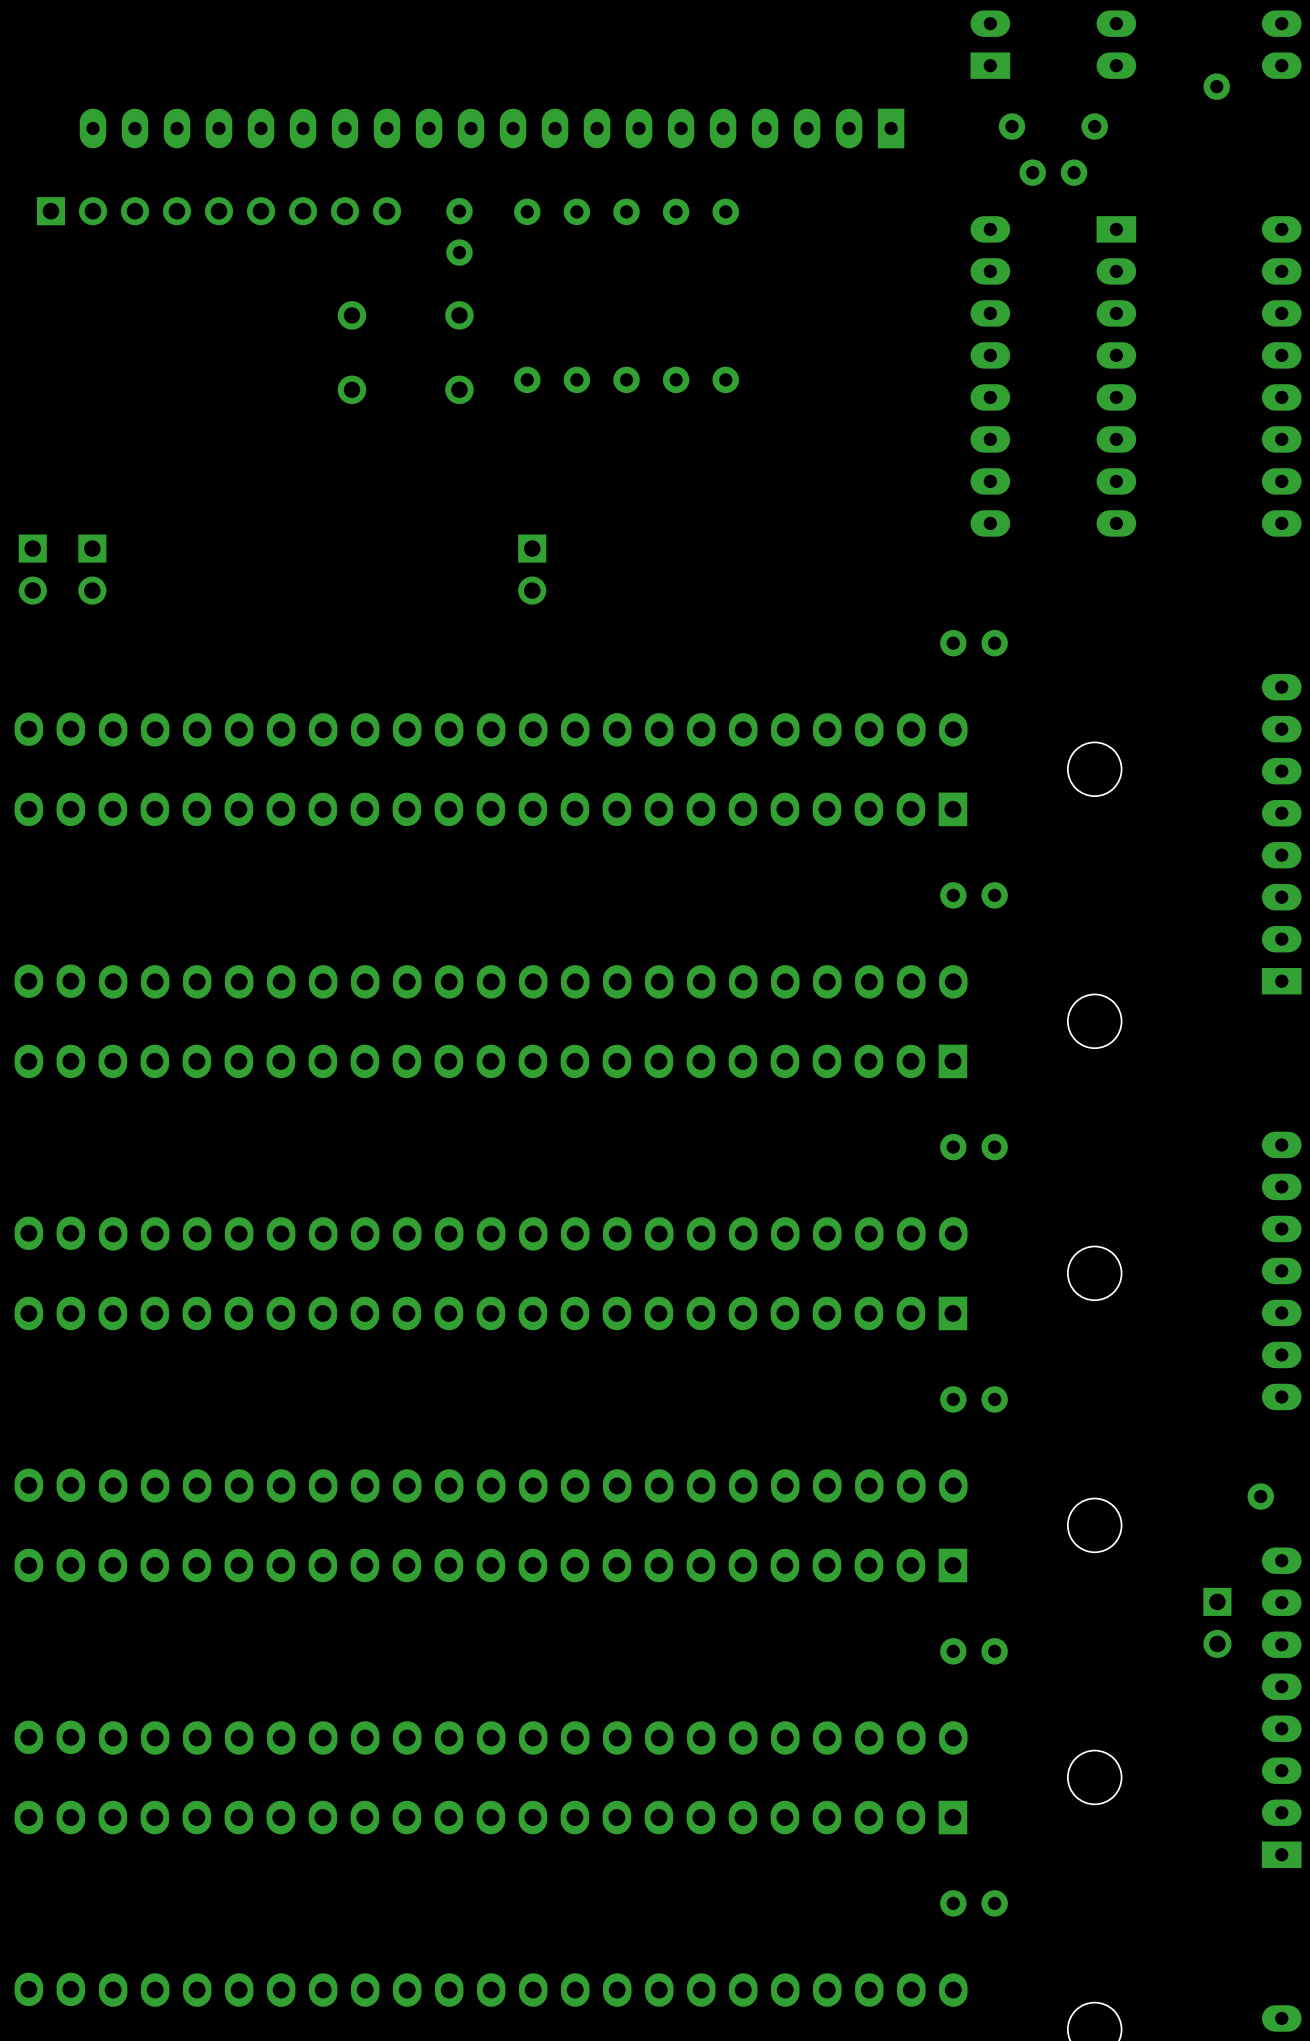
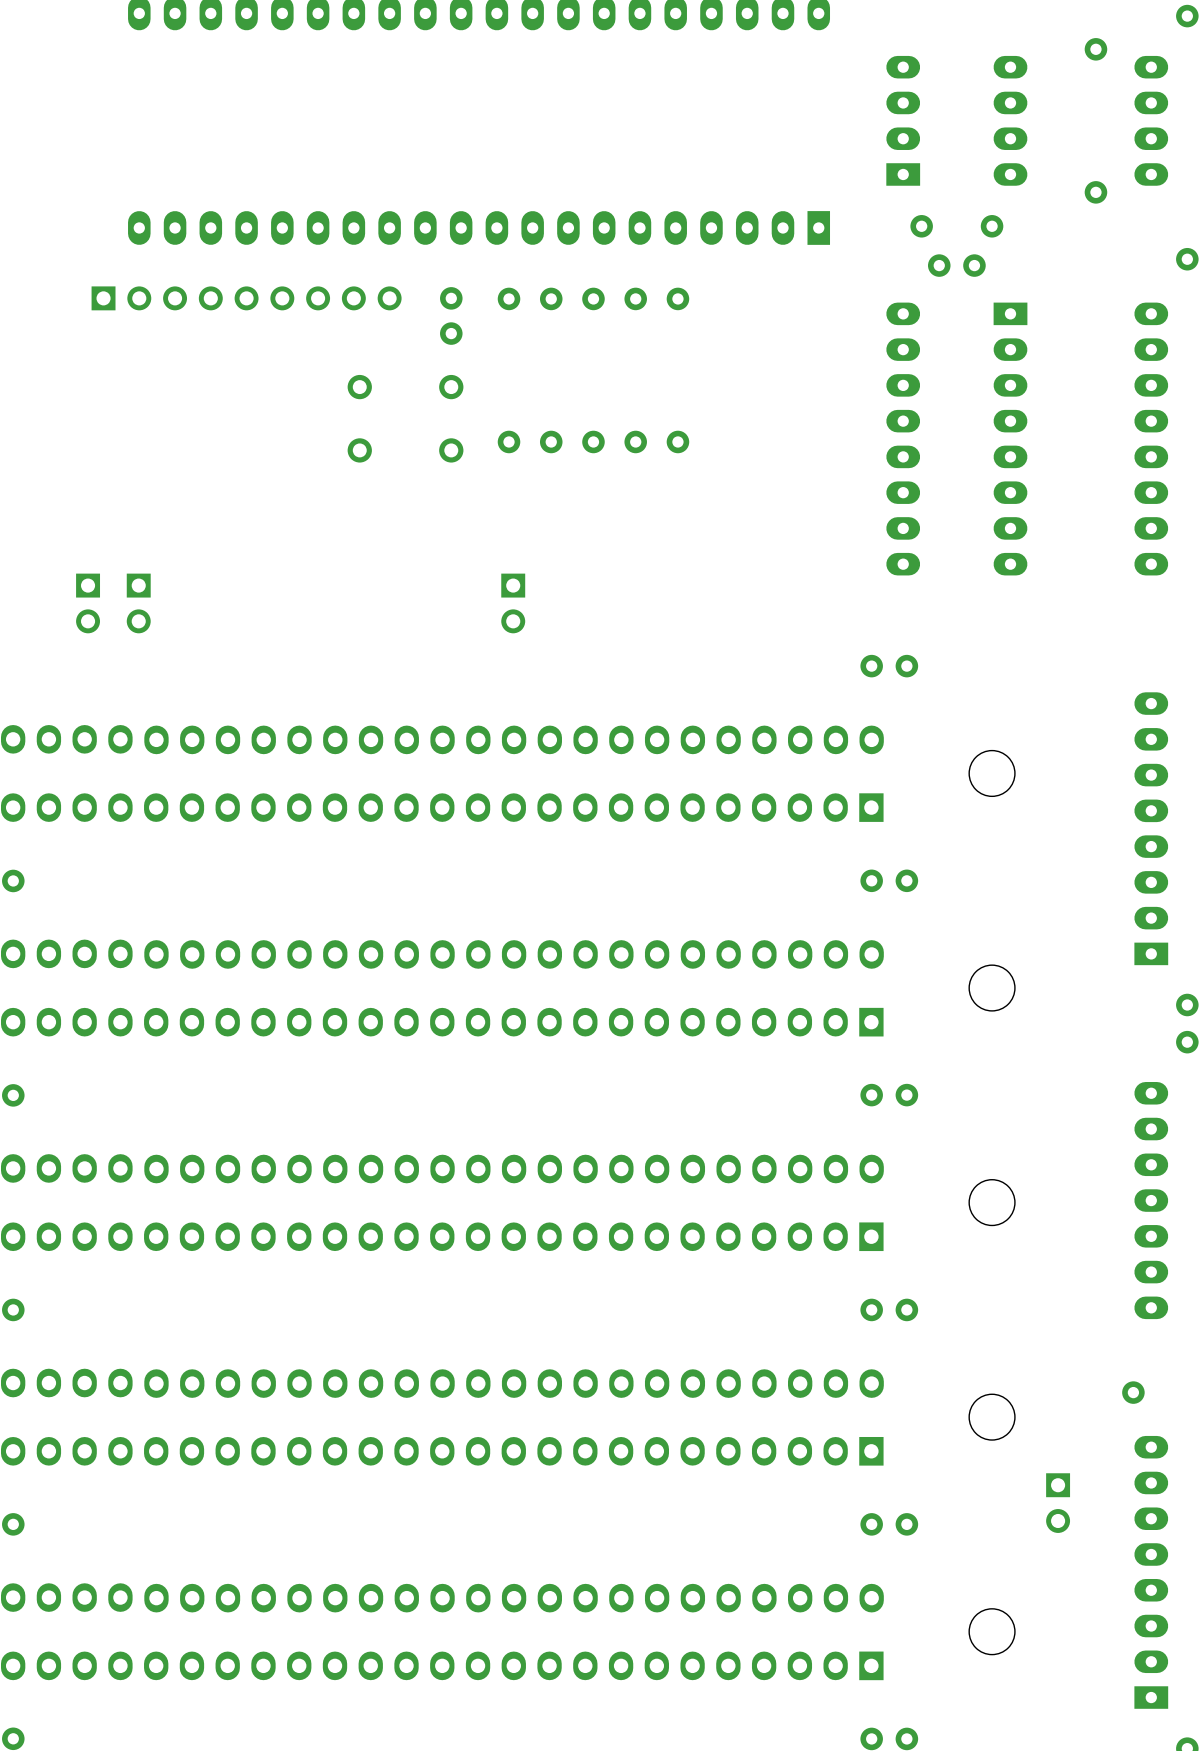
part position: (1217, 1622) -> (1058, 1503)

